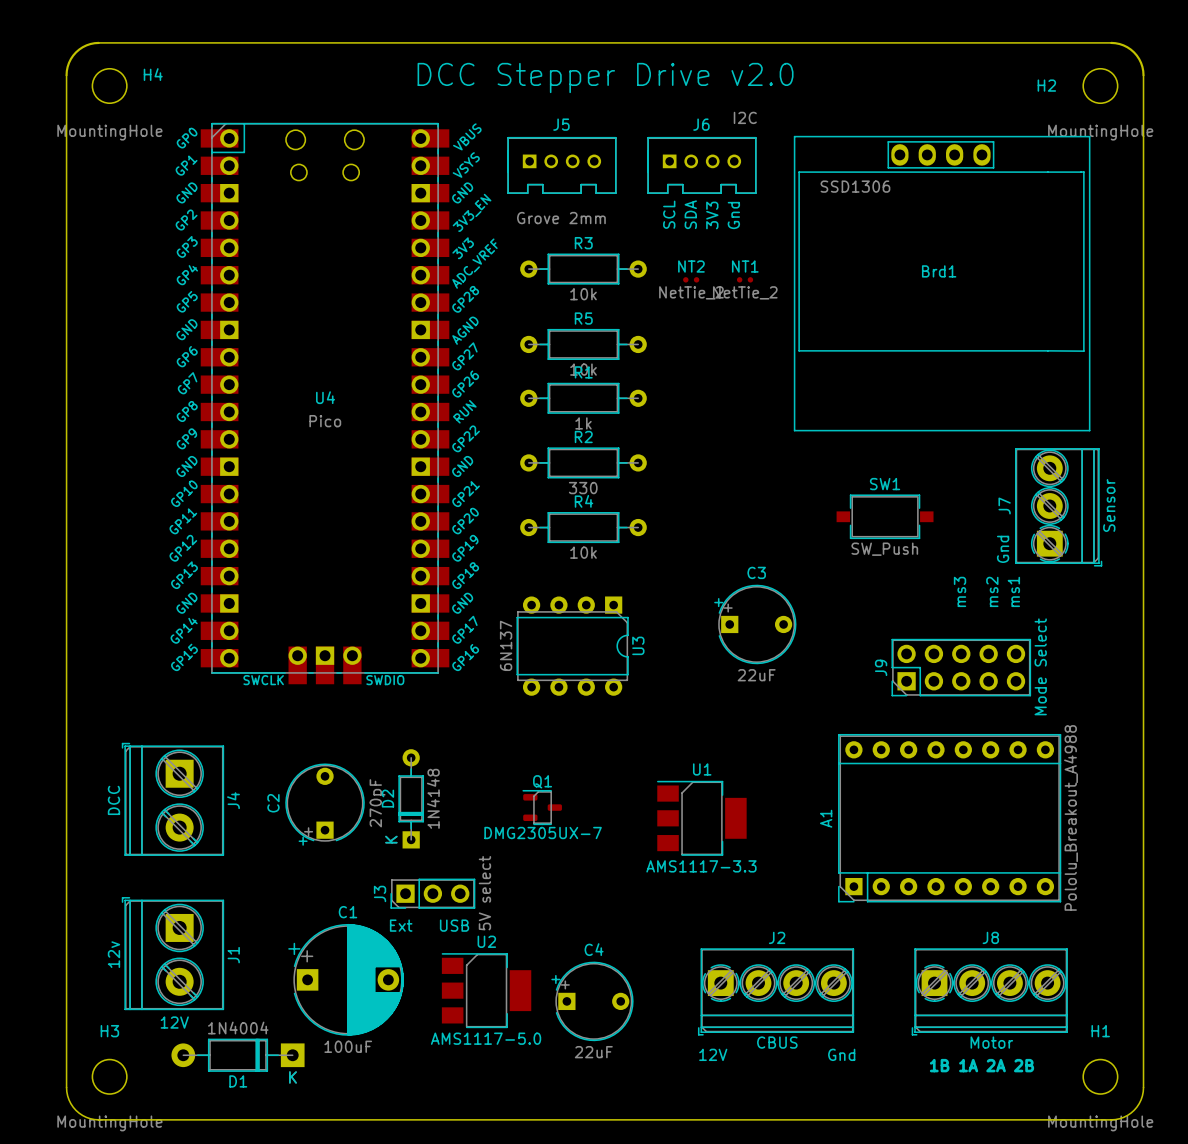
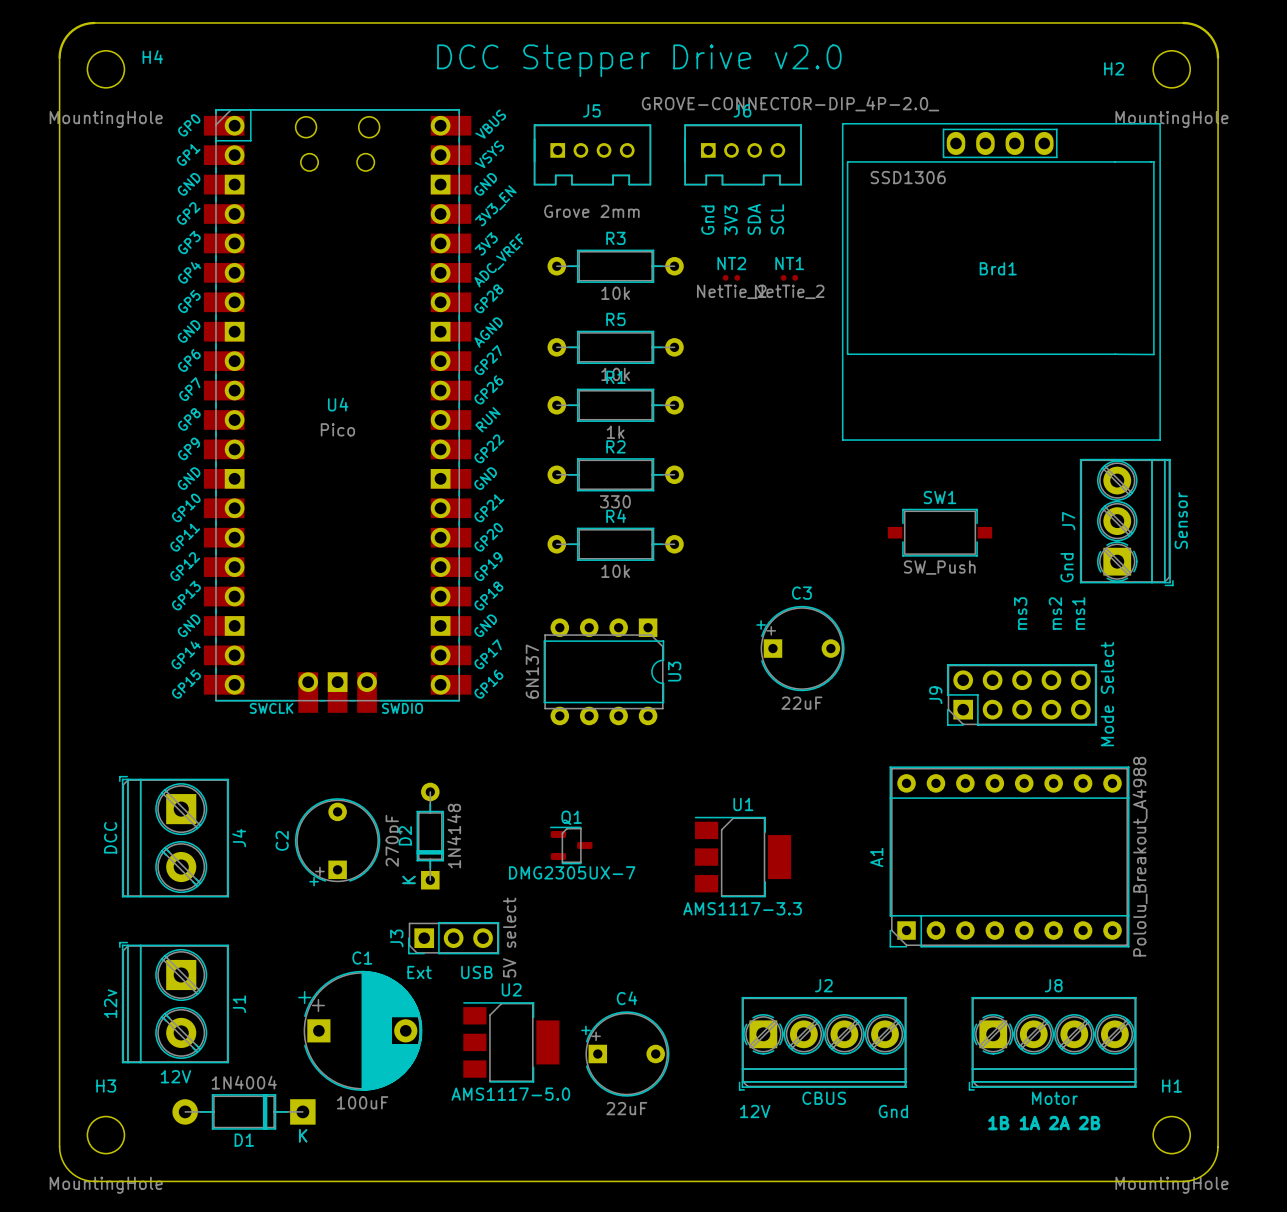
J6 value: I2C (745, 117) -> GROVE-CONNECTOR-DIP_4P-2.0_ (790, 103)
text: SCL (669, 214) -> Gnd (707, 220)
text: SDA (690, 214) -> 3V3 (731, 220)
text: 3V3 (712, 215) -> SDA (754, 219)
text: Gnd (733, 215) -> SCL (777, 219)

